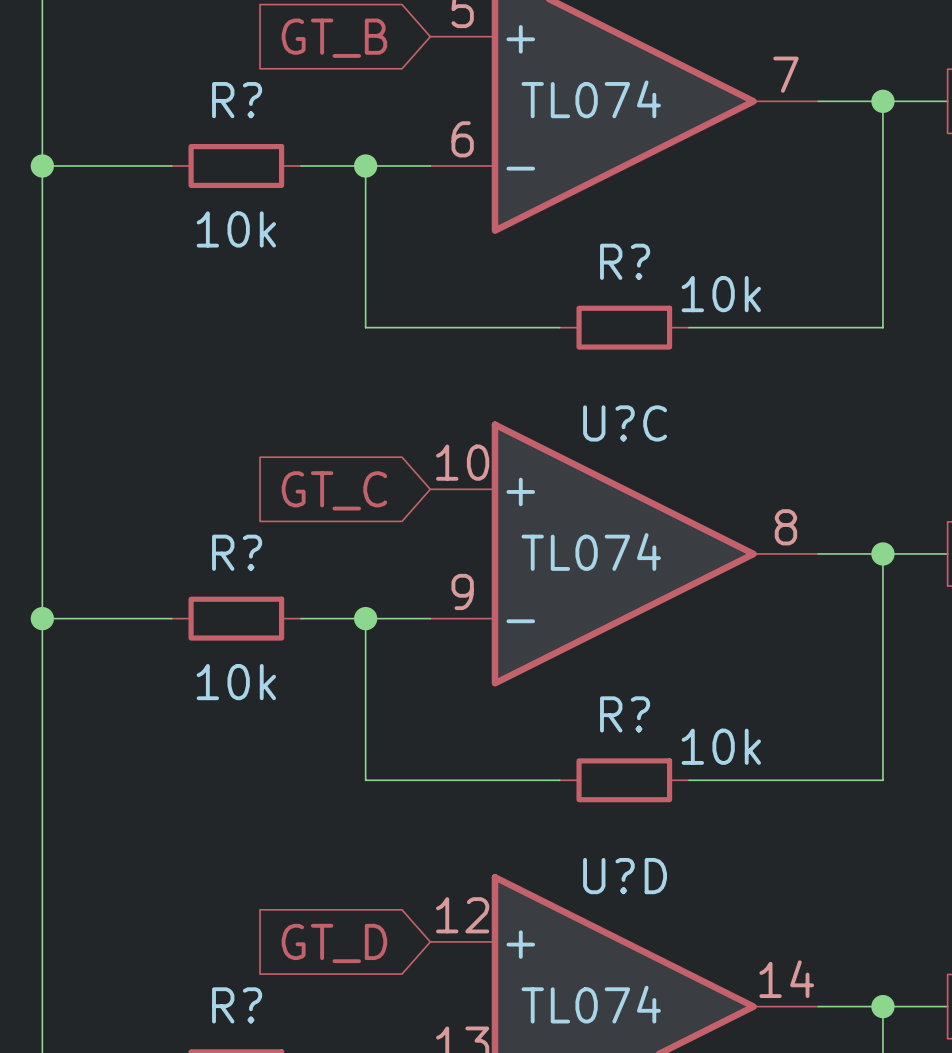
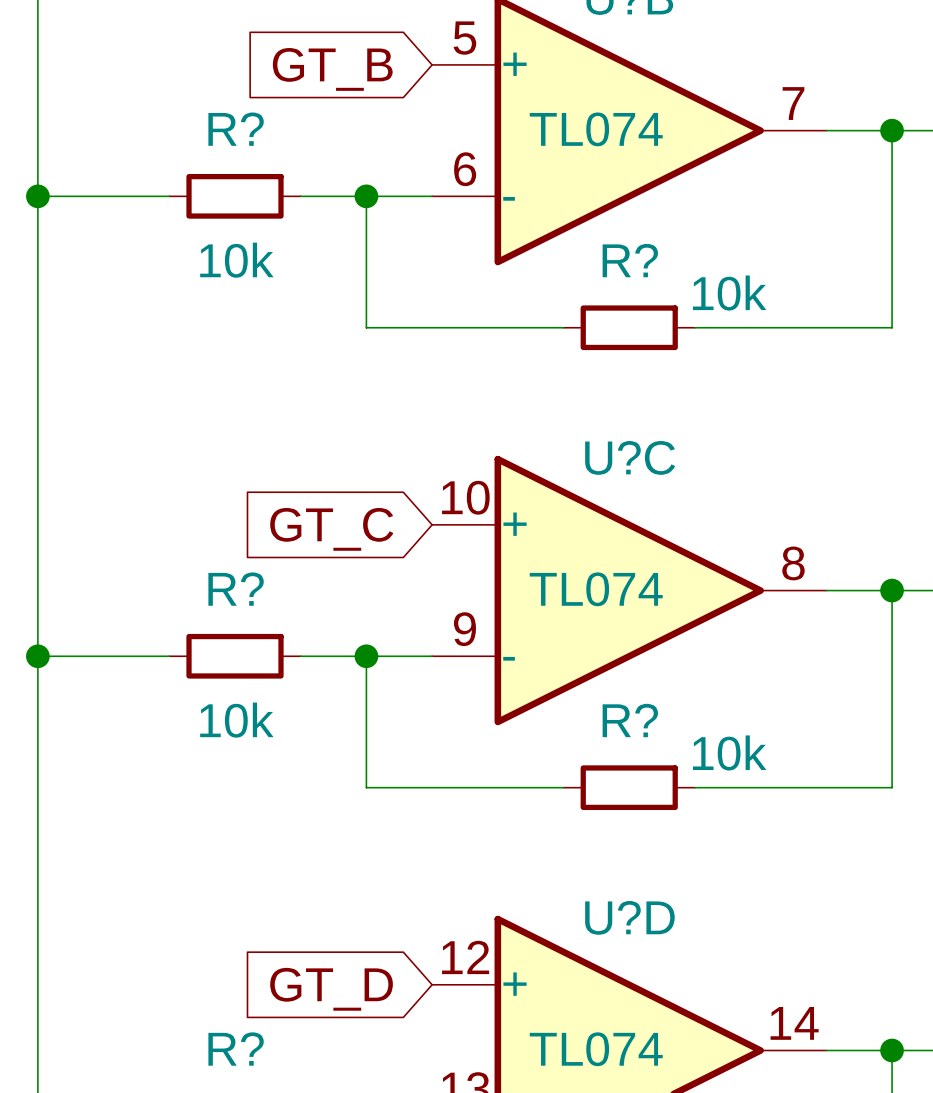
wire: (365, 295) (365, 327) (559, 327) -> (366, 327) (563, 327)
wire: (882, 295) (882, 327) (688, 327) -> (892, 327) (694, 327)
R? position: (624, 327) -> (629, 327)
wire: (365, 747) (365, 780) (559, 780) -> (366, 787) (563, 787)
wire: (882, 747) (882, 780) (688, 780) -> (892, 787) (694, 787)
R? position: (624, 780) -> (629, 787)

